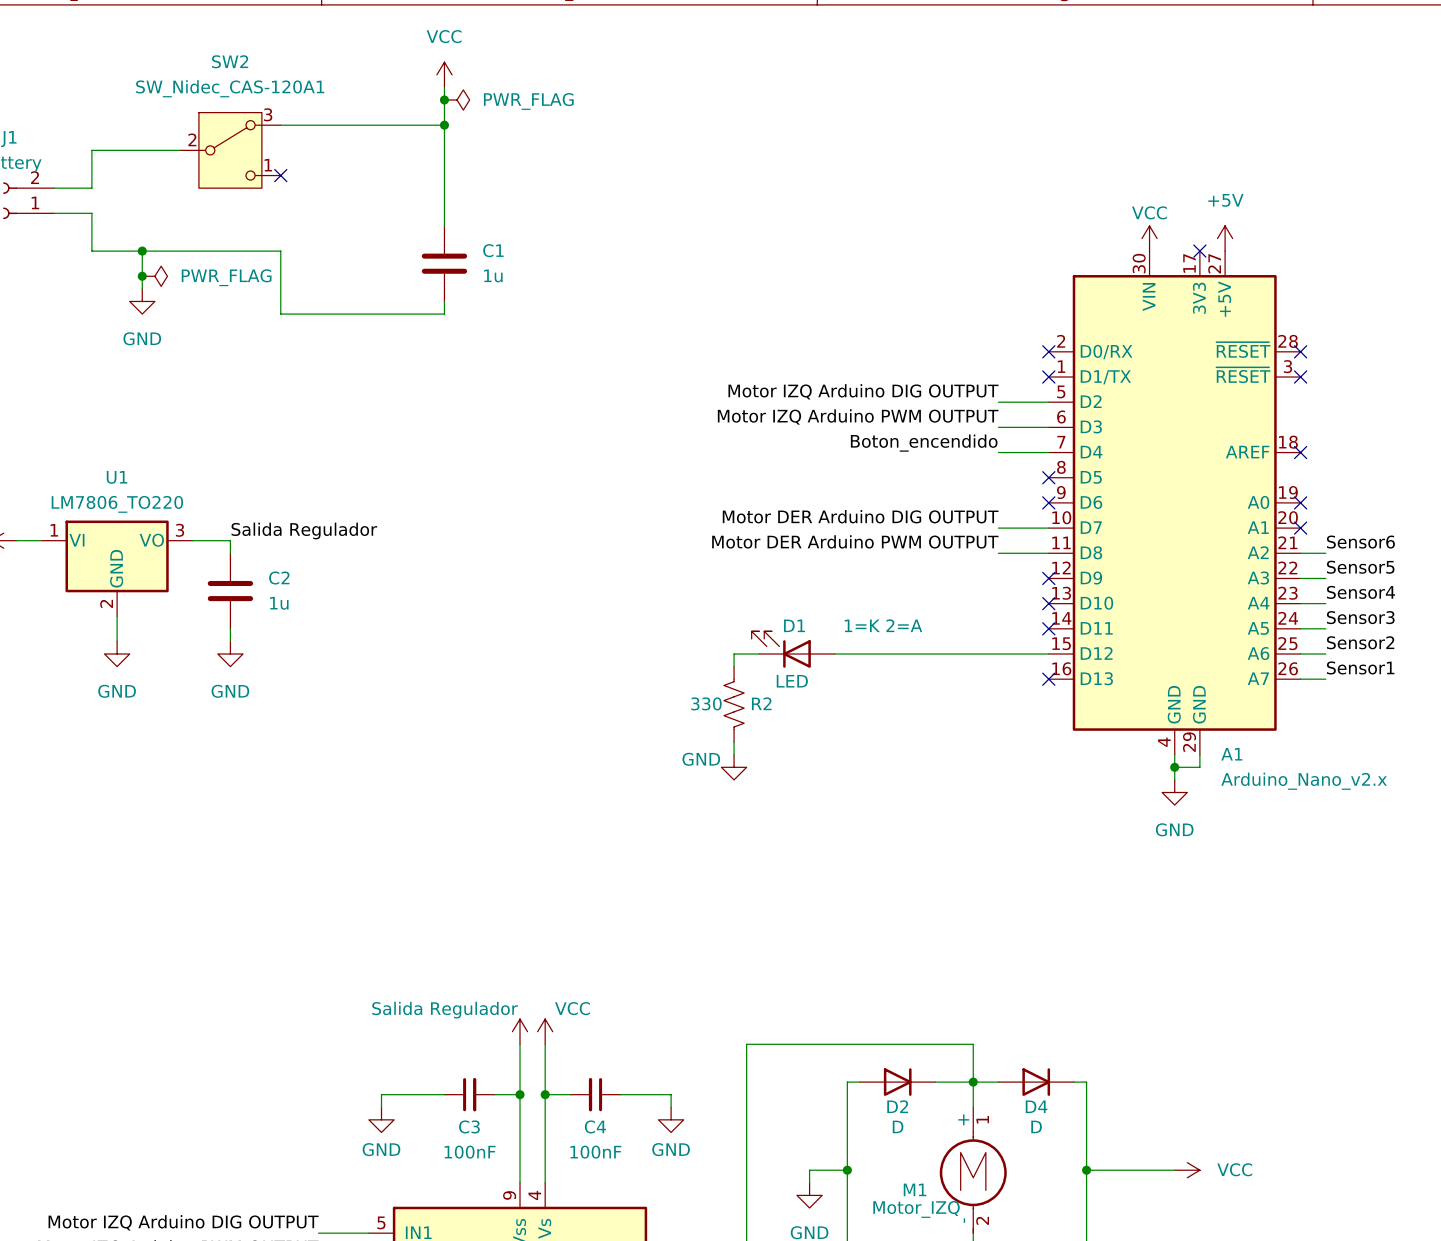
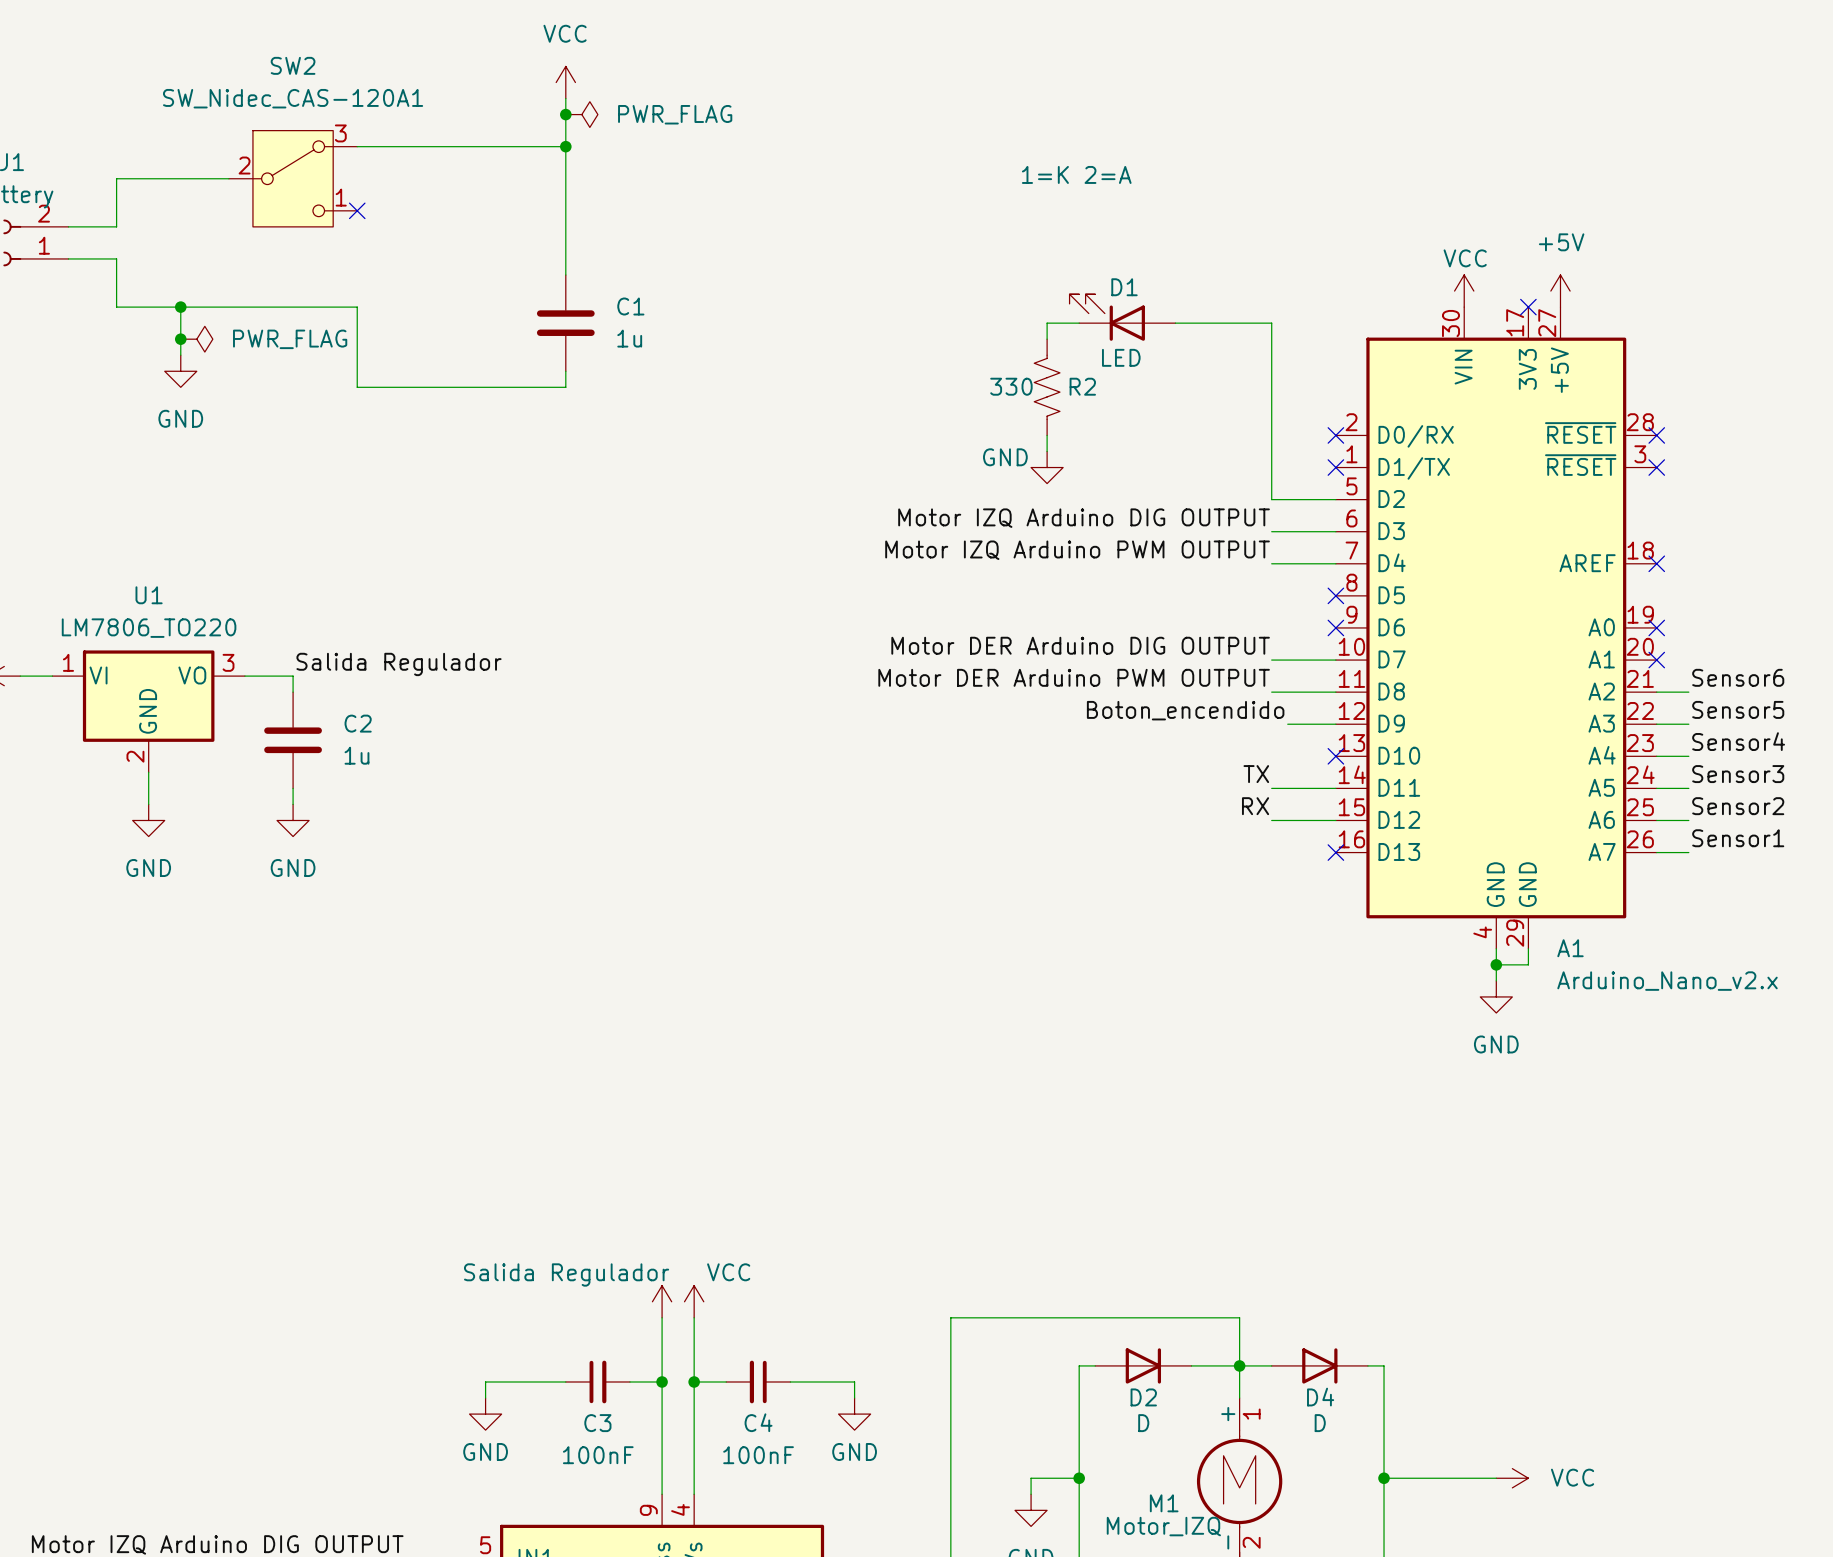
wire: none -> (1079, 323) (1047, 323) (1047, 339)
wire: none -> (1175, 323) (1271, 323) (1271, 499)
wire: none -> (1047, 435) (1047, 451)
power symbol: none -> GND (1047, 467)
label: Motor IZQ Arduino DIG OUTPUT (863, 391) -> none
label: Motor IZQ Arduino PWM OUTPUT (858, 416) -> Motor IZQ Arduino DIG OUTPUT (1084, 518)
label: Boton_encendido (924, 443) -> Motor IZQ Arduino PWM OUTPUT (1077, 550)
label: none -> Boton_encendido (1185, 710)
wire: none -> (1287, 724) (1335, 724)
no-connect mark: (1048, 578) -> none
label: none -> TX (1256, 774)
D1 text position: 1=K 2=A (883, 625) -> 1=K 2=A (1076, 174)
wire: none -> (1271, 788) (1335, 788)
no-connect mark: (1048, 628) -> none
label: none -> RX (1255, 806)
D1 position: (793, 649) -> (1122, 317)
wire: (759, 654) (734, 654) (734, 666) -> none
wire: (834, 654) (998, 654) -> none
R2 position: (734, 704) -> (1047, 387)
wire: (734, 742) (734, 754) -> none
power symbol: GND (734, 767) -> none

